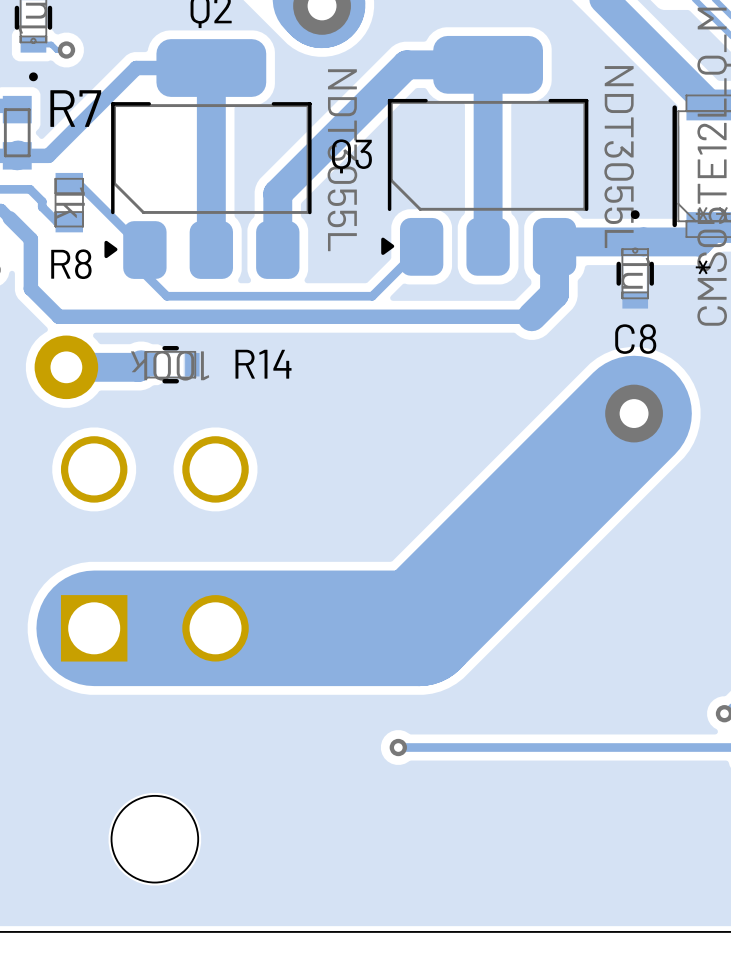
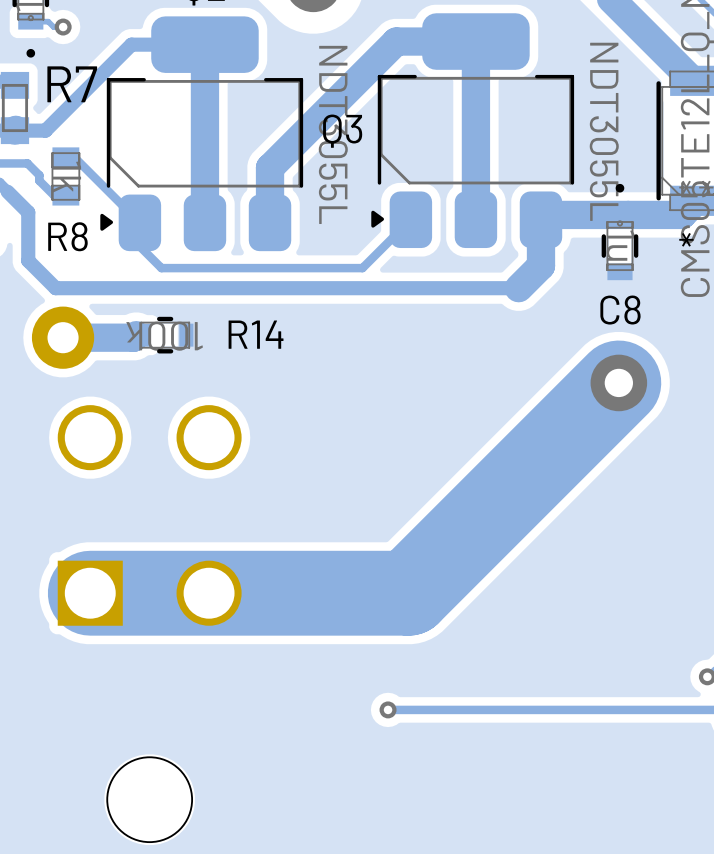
track width: thick (634, 413) (419, 628) (94, 628) -> thin (618, 382) (408, 593) (90, 593)

